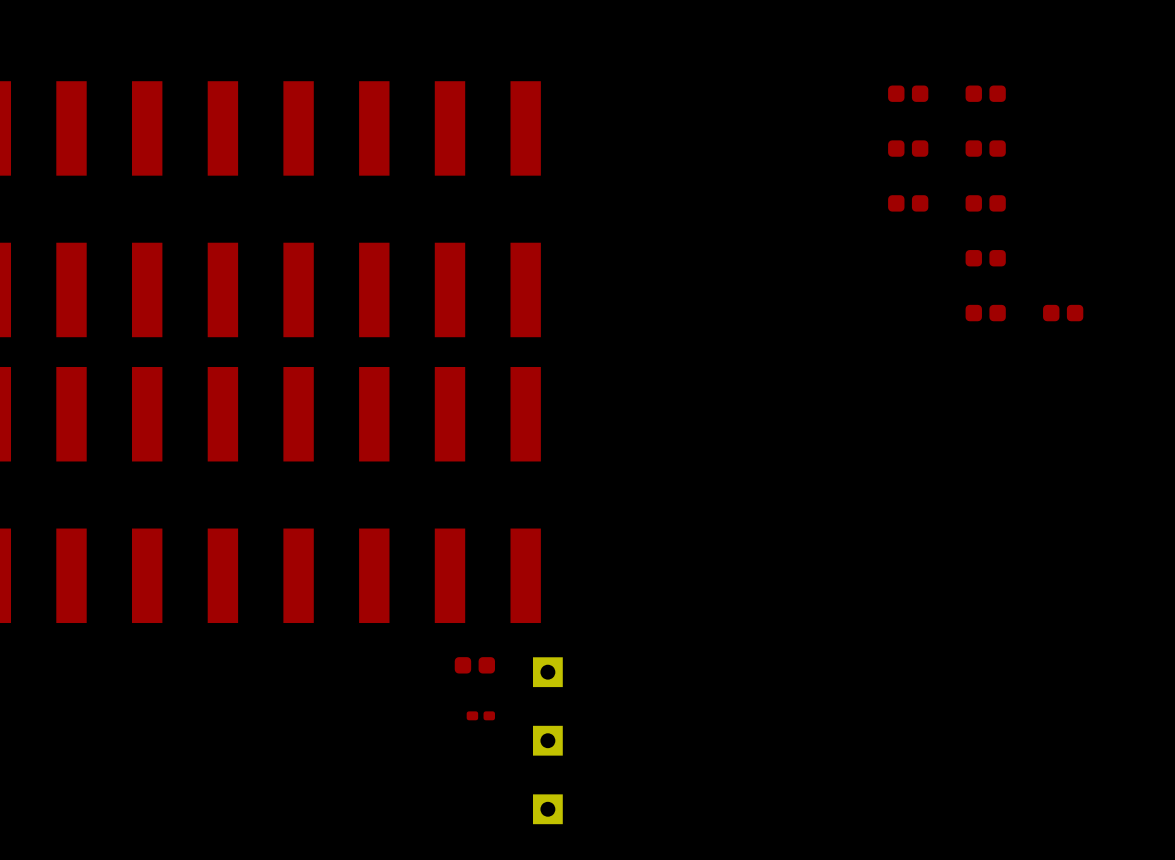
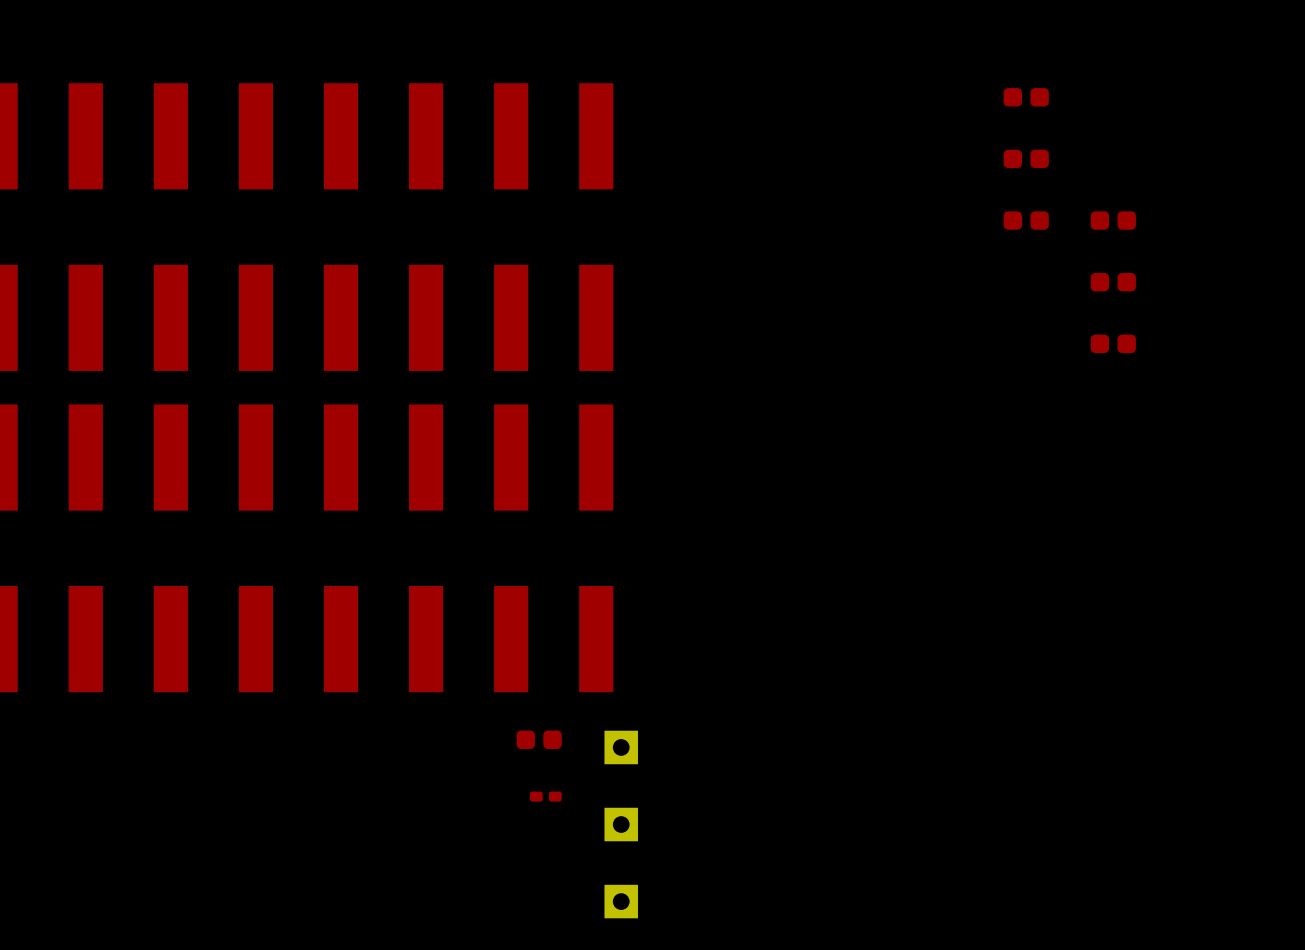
part: (985, 93) -> none
part: (985, 148) -> none
part: (1063, 313) -> none

